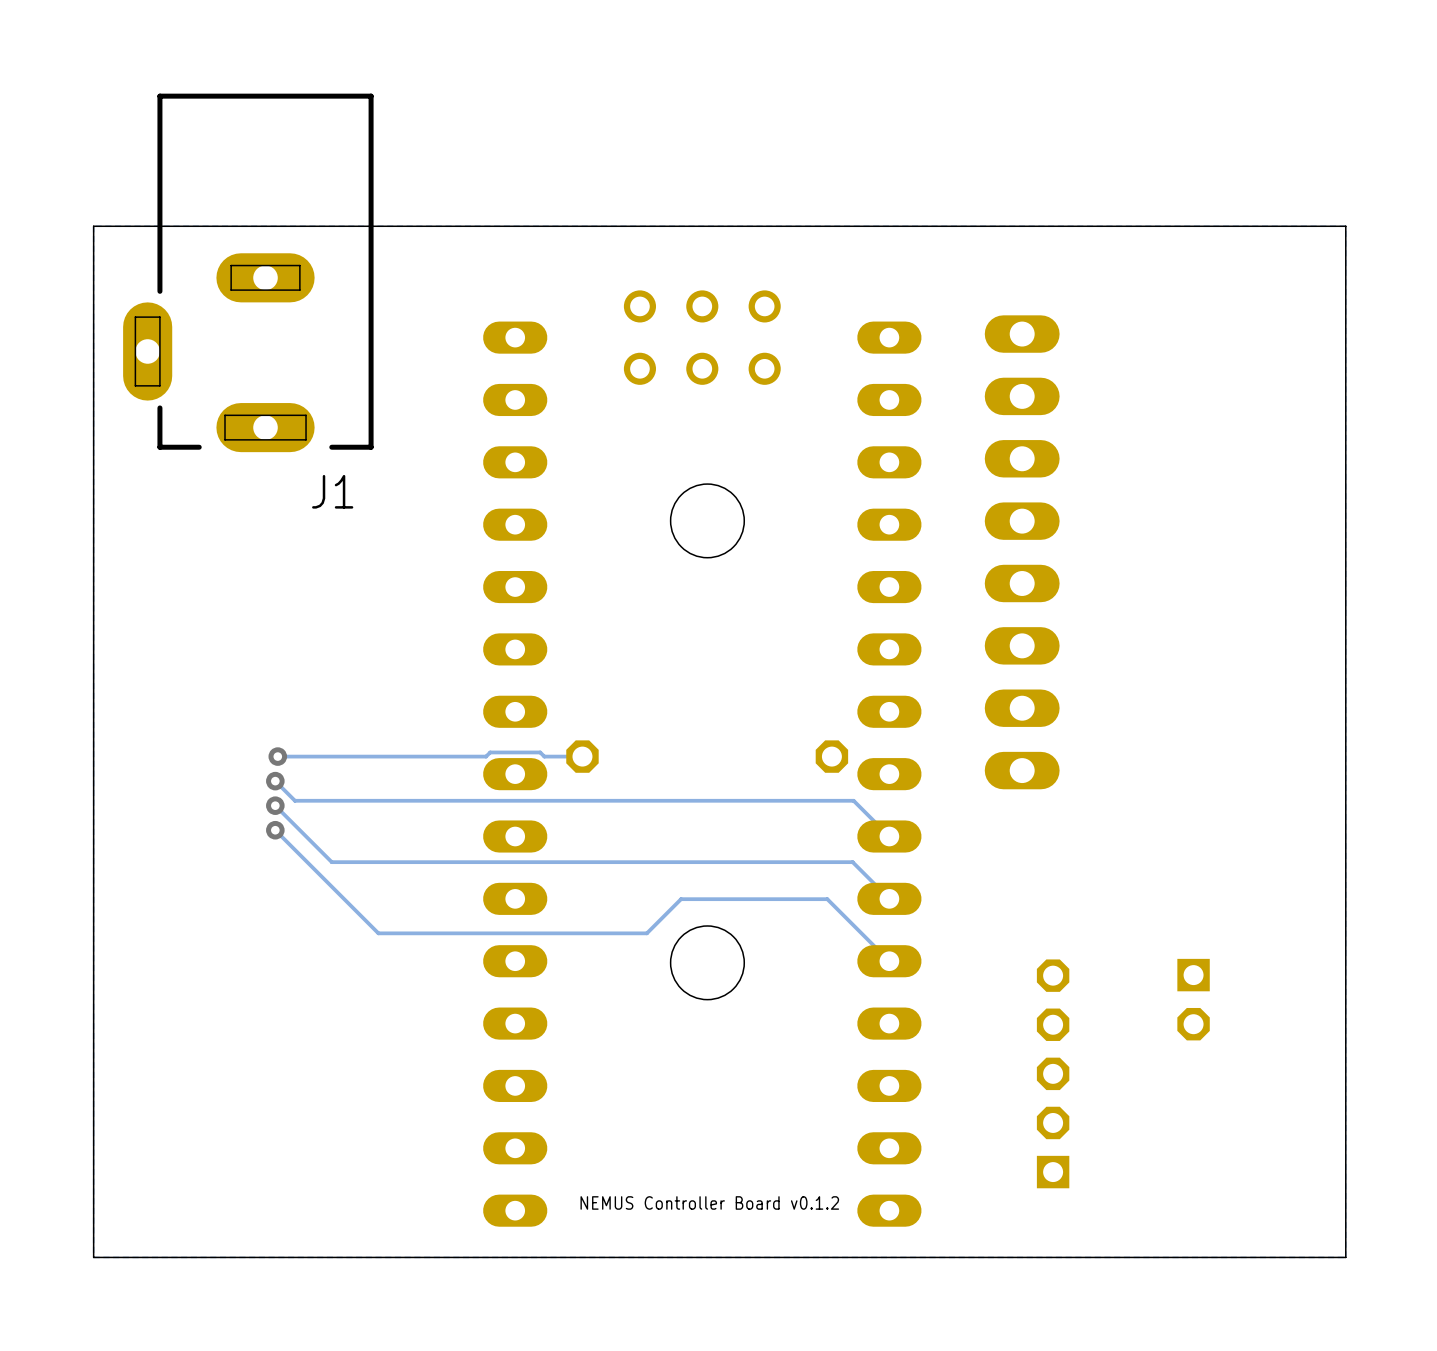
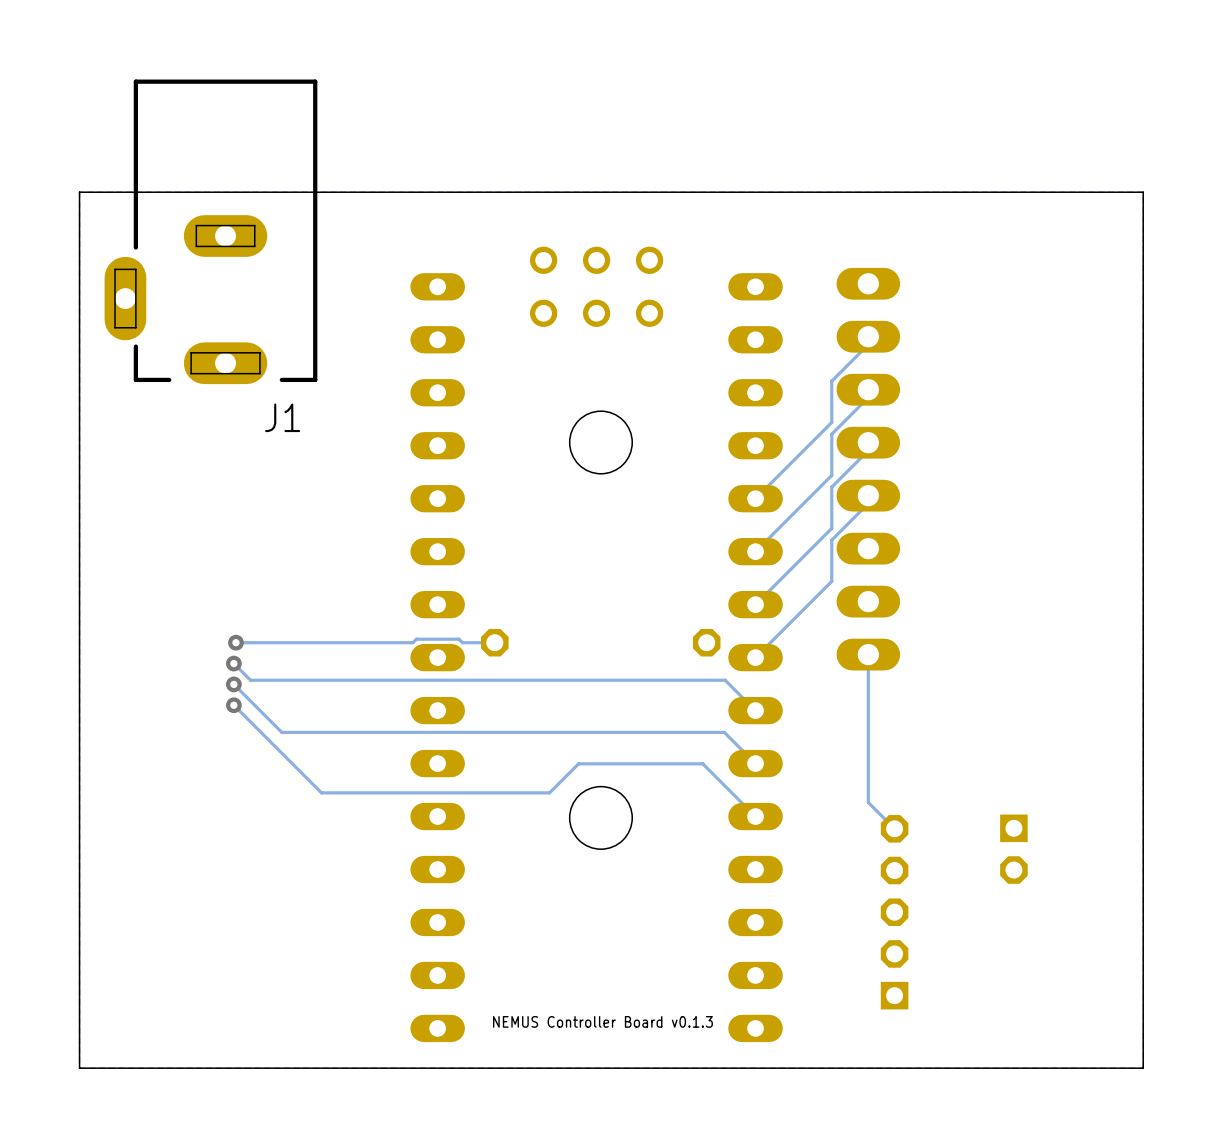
track: none -> (868, 336) (868, 344) (831, 381) (831, 422) (755, 498)
track: none -> (868, 389) (868, 397) (831, 434) (831, 475) (755, 551)
track: none -> (868, 442) (868, 450) (831, 487) (831, 528) (755, 604)
track: none -> (868, 495) (868, 503) (831, 540) (831, 581) (755, 657)
track: none -> (868, 654) (868, 802) (894, 828)
text: NEMUS Controller Board v0.1.2 (709, 1202) -> NEMUS Controller Board v0.1.3 (602, 1021)

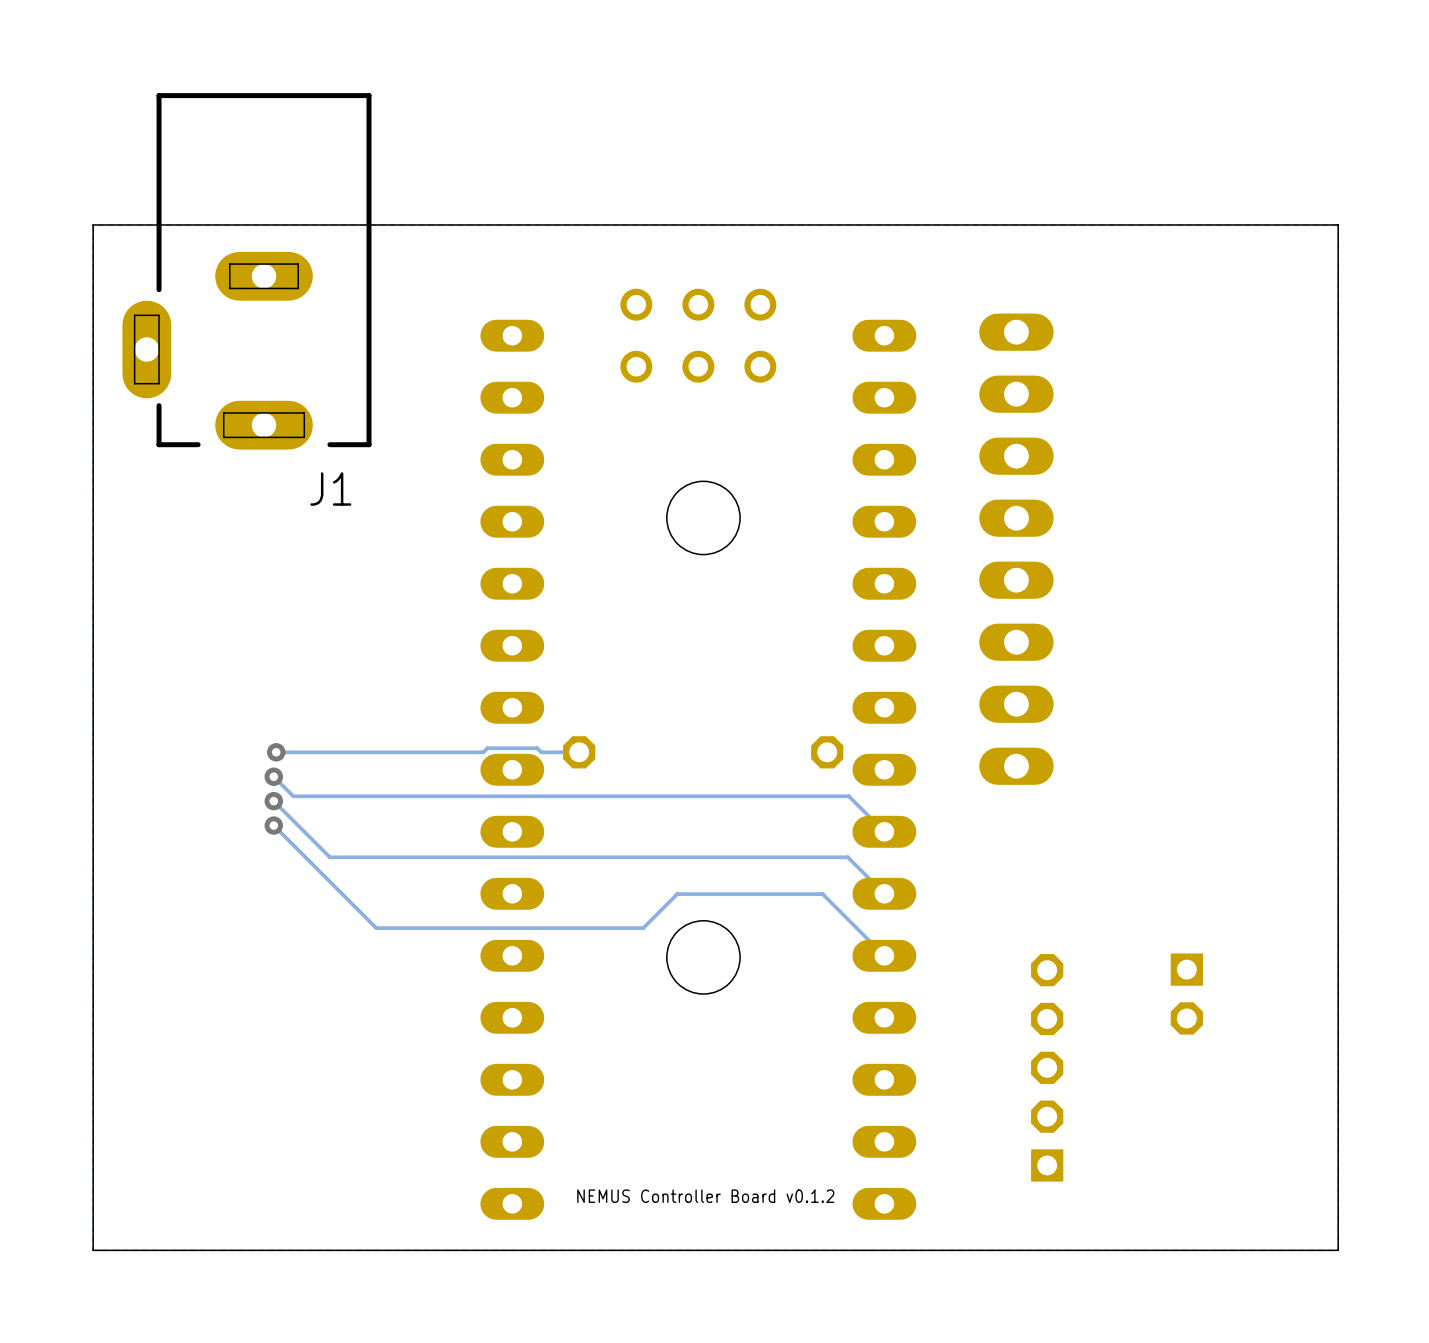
track: (868, 336) (868, 344) (831, 381) (831, 422) (755, 498) -> none
track: (868, 389) (868, 397) (831, 434) (831, 475) (755, 551) -> none
track: (868, 442) (868, 450) (831, 487) (831, 528) (755, 604) -> none
track: (868, 495) (868, 503) (831, 540) (831, 581) (755, 657) -> none
track: (868, 654) (868, 802) (894, 828) -> none
text: NEMUS Controller Board v0.1.3 (602, 1021) -> NEMUS Controller Board v0.1.2 (705, 1196)

